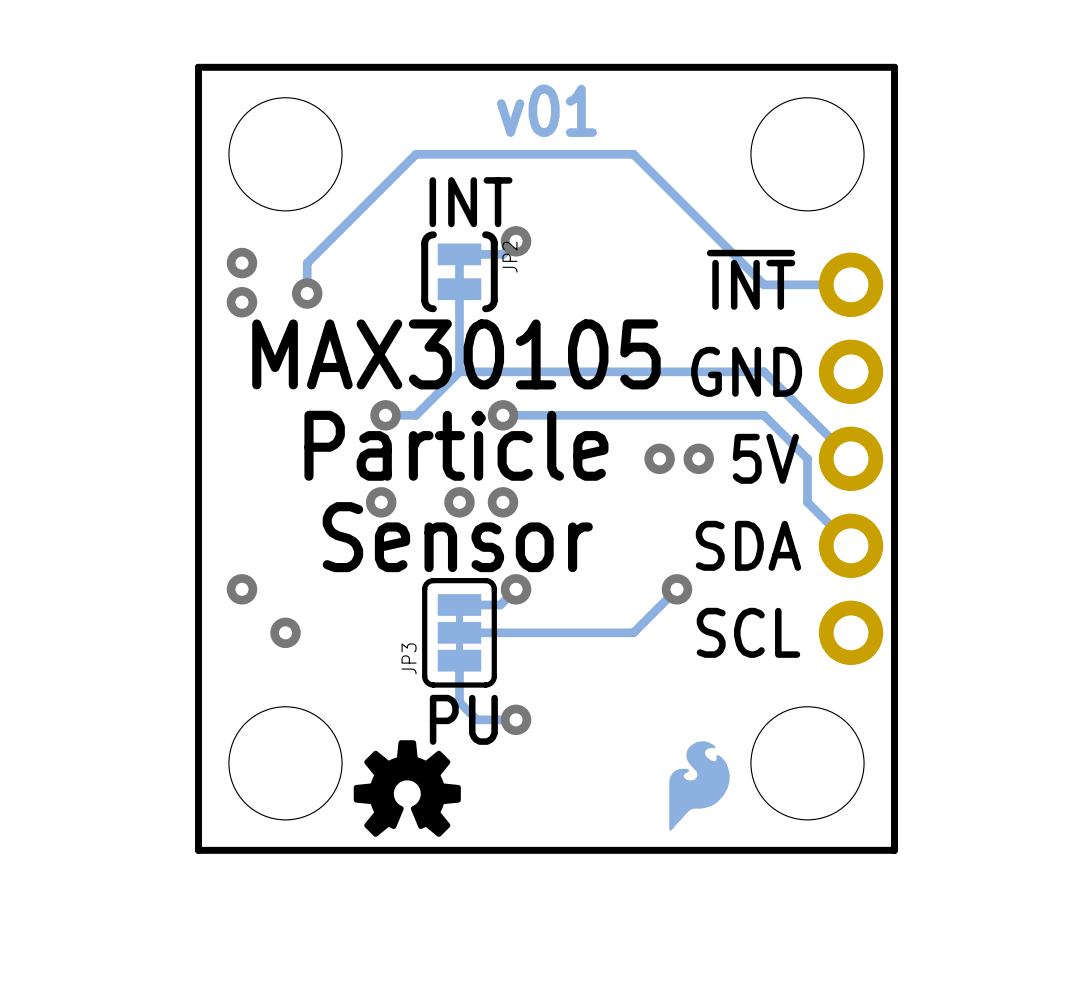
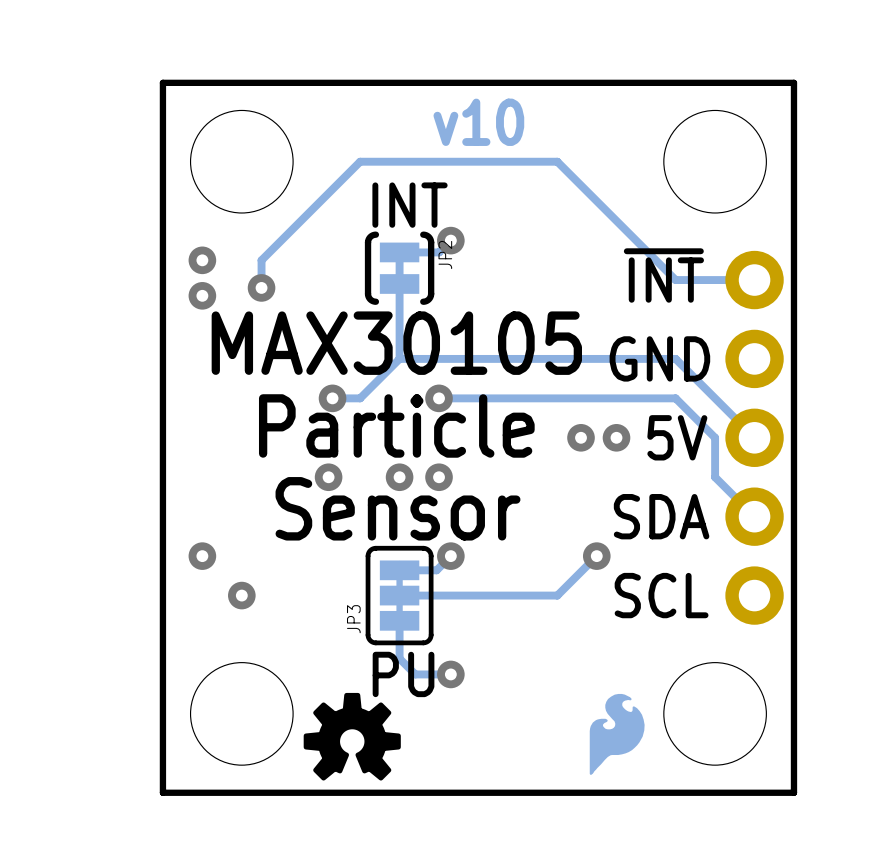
text: v01 (546, 110) -> v10 (478, 122)

